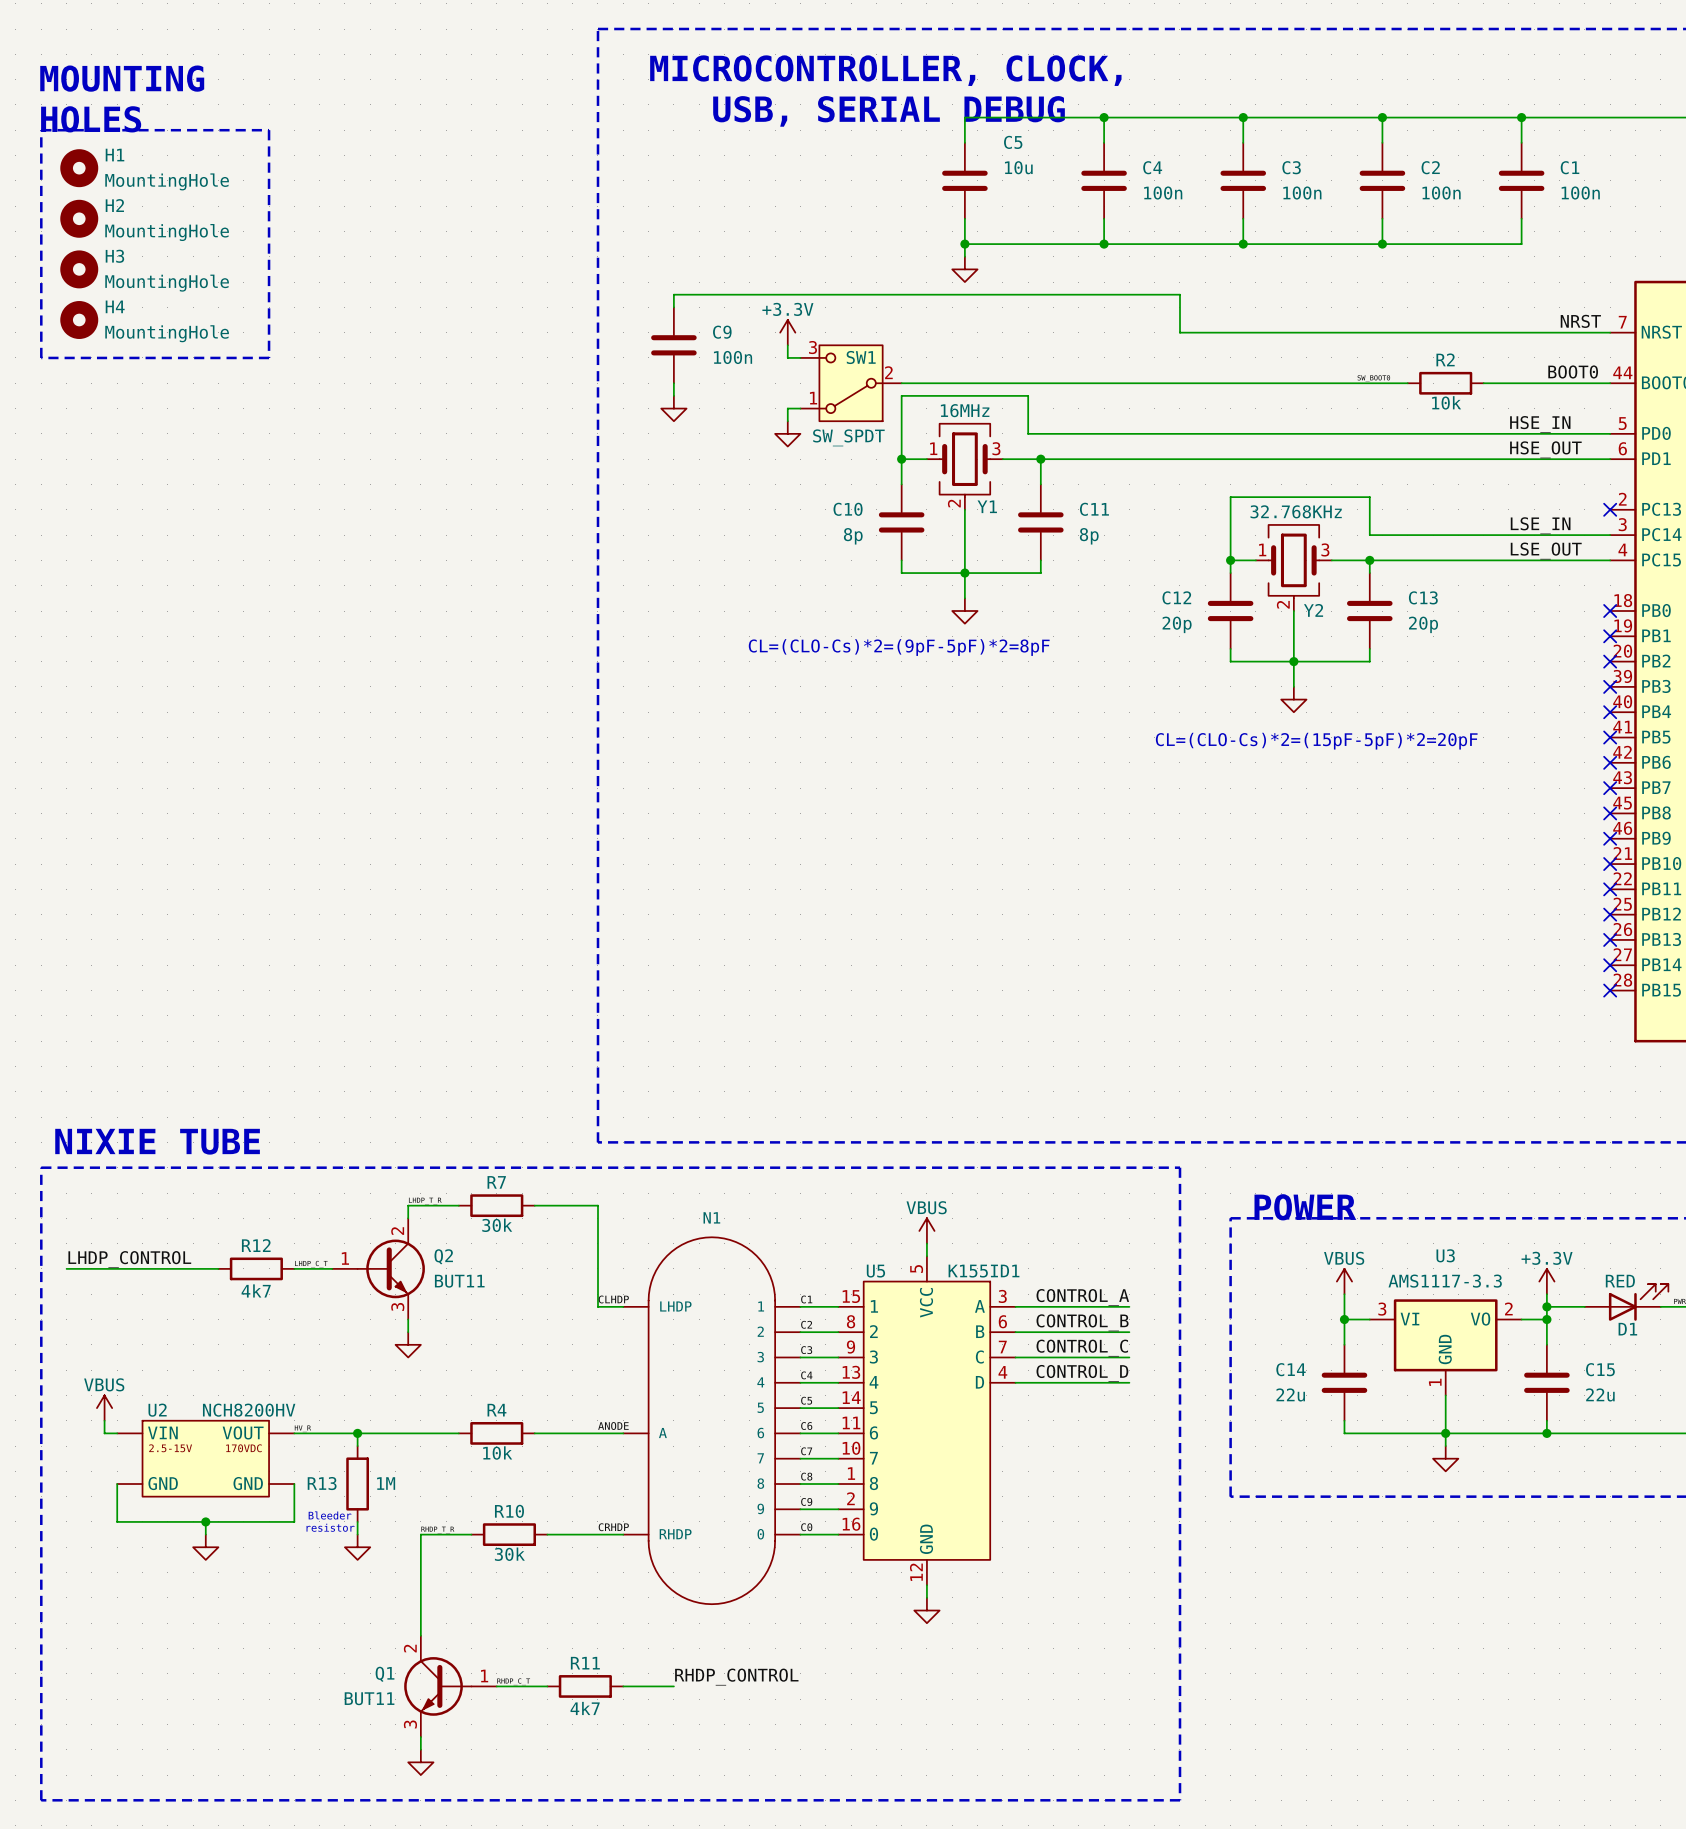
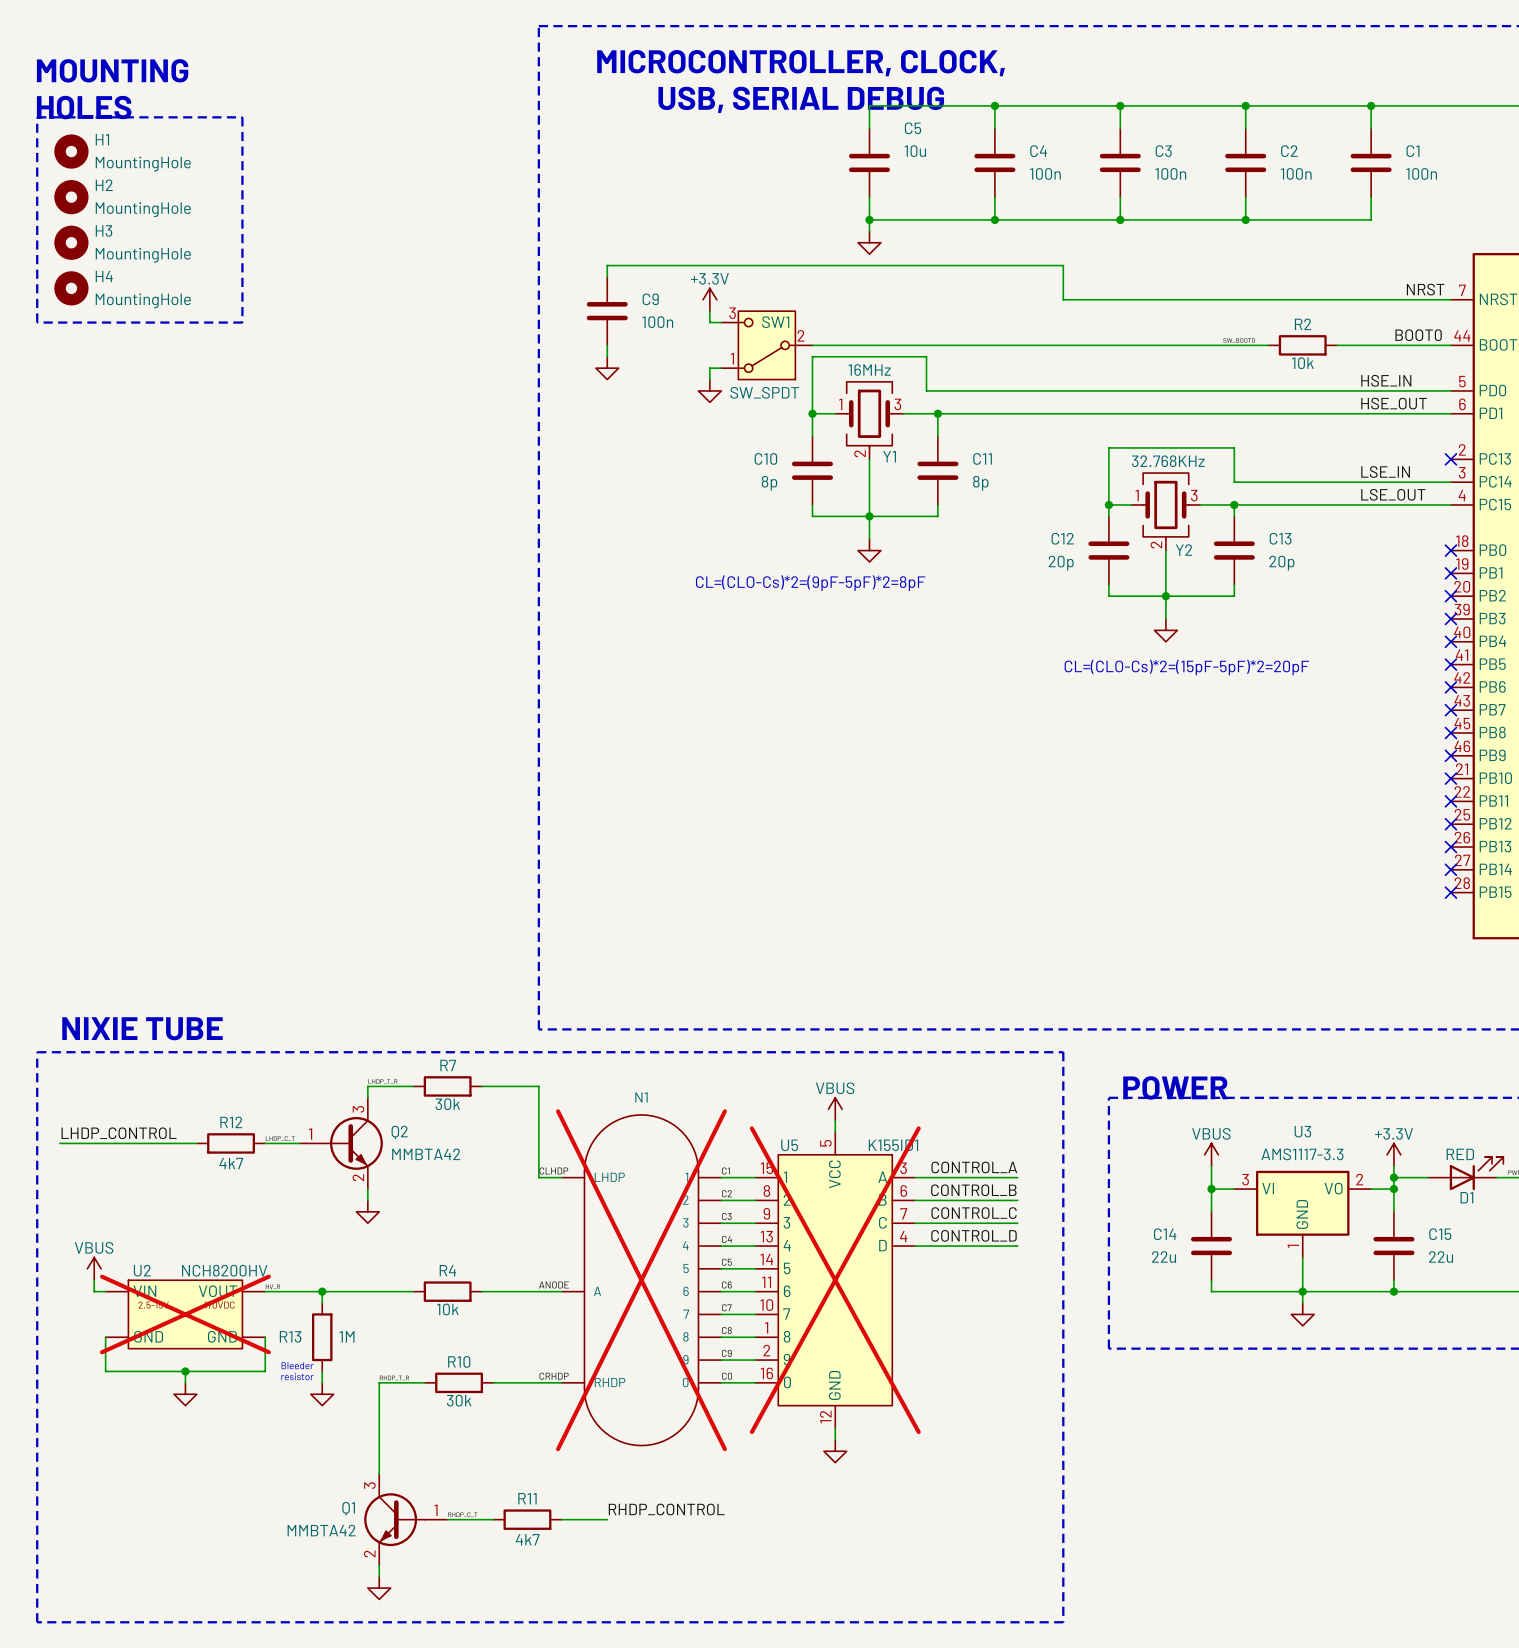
Q2 pin number: 2 (397, 1231) -> 3 (358, 1109)
Q2 value: BUT11 (459, 1281) -> MMBTA42 (426, 1154)
Q2 pin number: 3 (397, 1306) -> 2 (358, 1177)
N1 do-not-place cross: none -> (641, 1280)
U5 do-not-place cross: none -> (835, 1280)
U2 do-not-place cross: none -> (185, 1314)
Q1 pin number: 2 (410, 1648) -> 3 (369, 1485)
Q1 value: BUT11 (369, 1698) -> MMBTA42 (321, 1530)
Q1 pin number: 3 (410, 1724) -> 2 (369, 1553)

